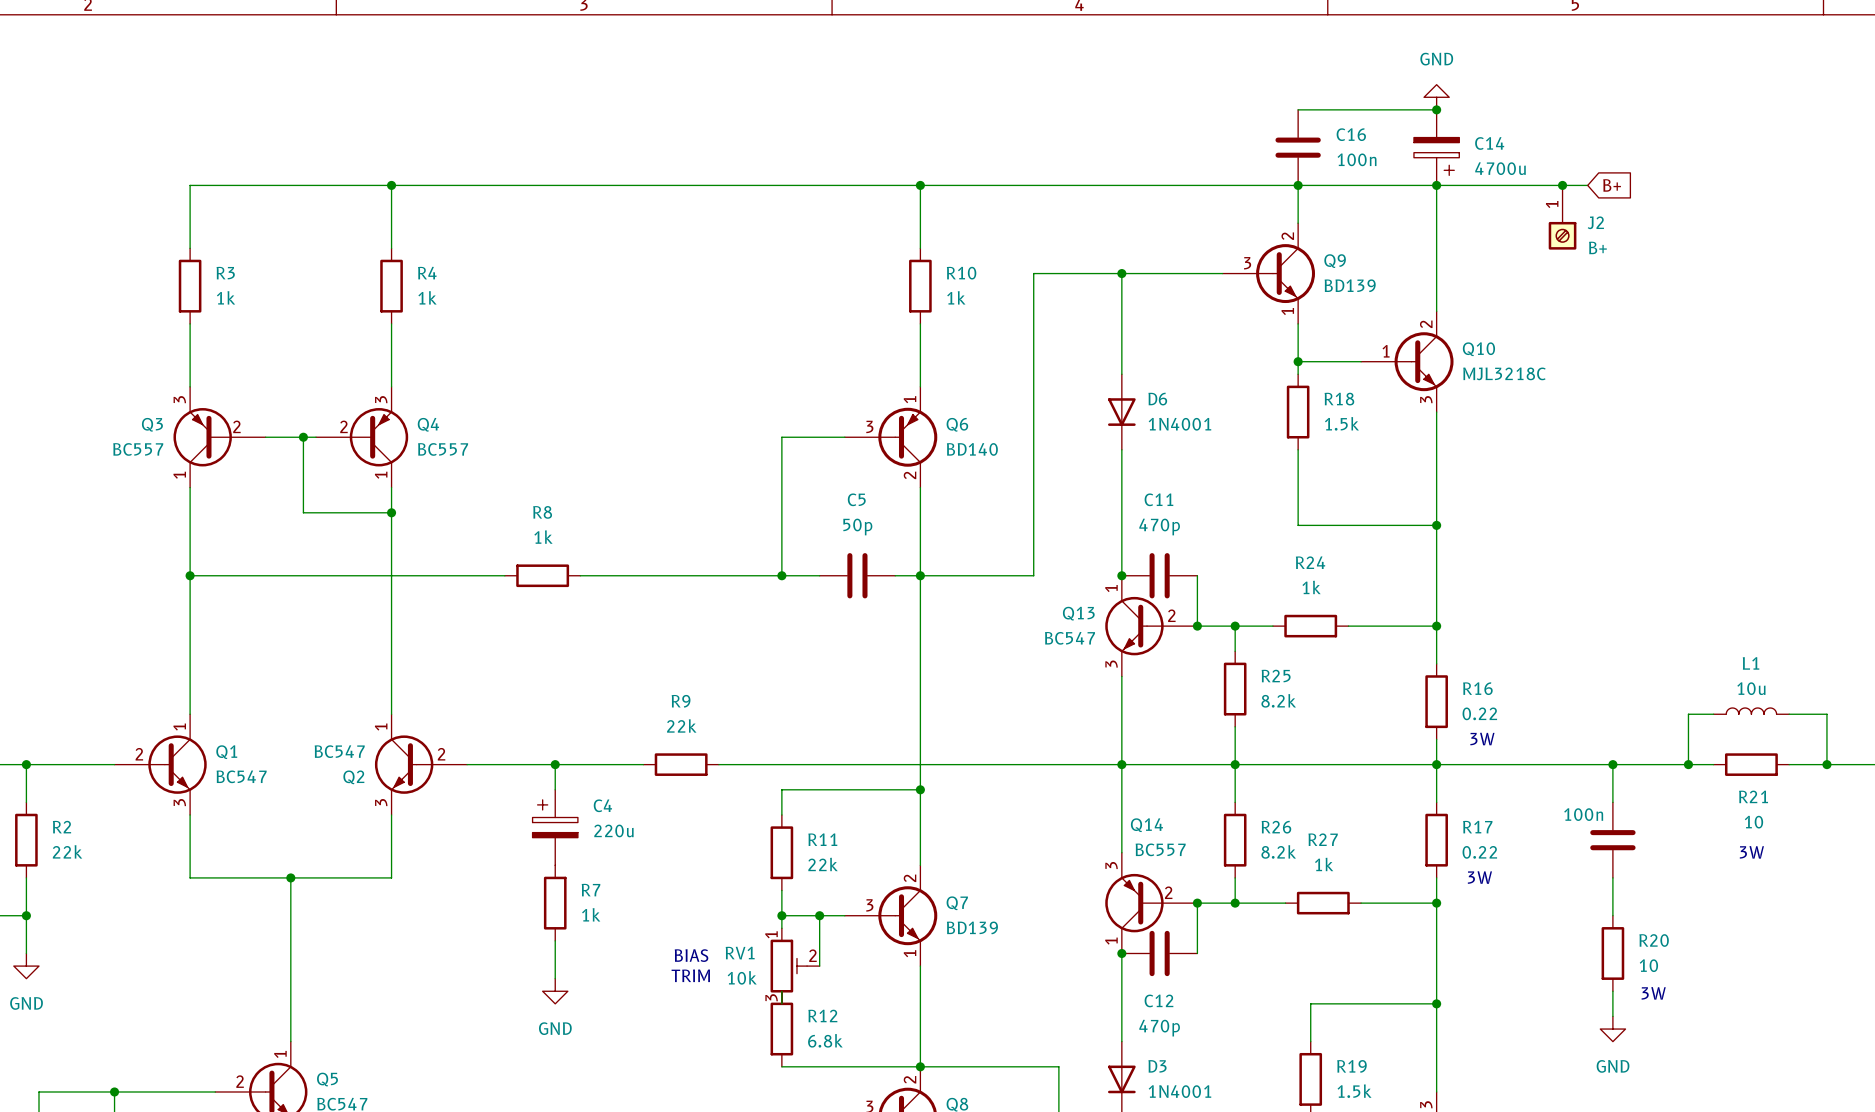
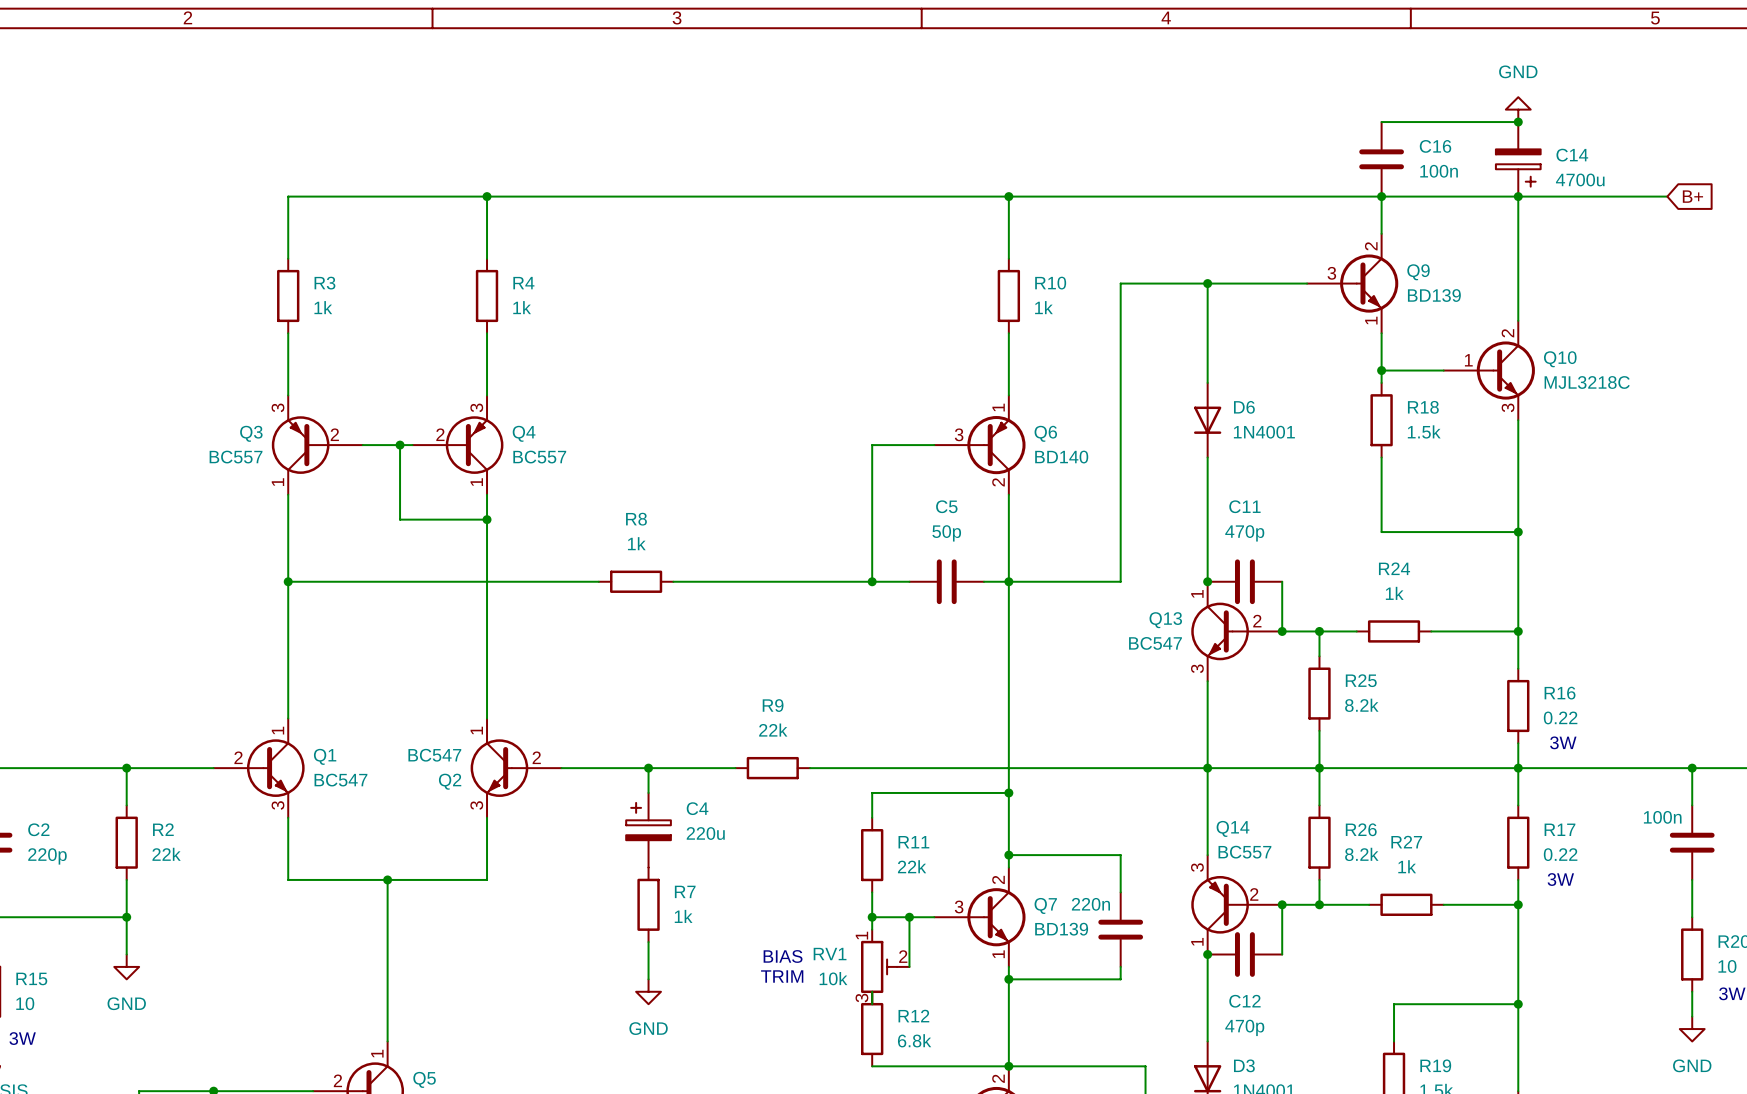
junction: (1562, 185) -> none
J2: B+ (1562, 217) -> none
wire: none -> (1008, 855) (1120, 855) (1120, 892)
junction: none -> (1008, 855)
part: none -> 220n (1120, 929)
wire: none -> (1120, 966) (1120, 979) (1008, 979)
junction: none -> (1008, 979)

